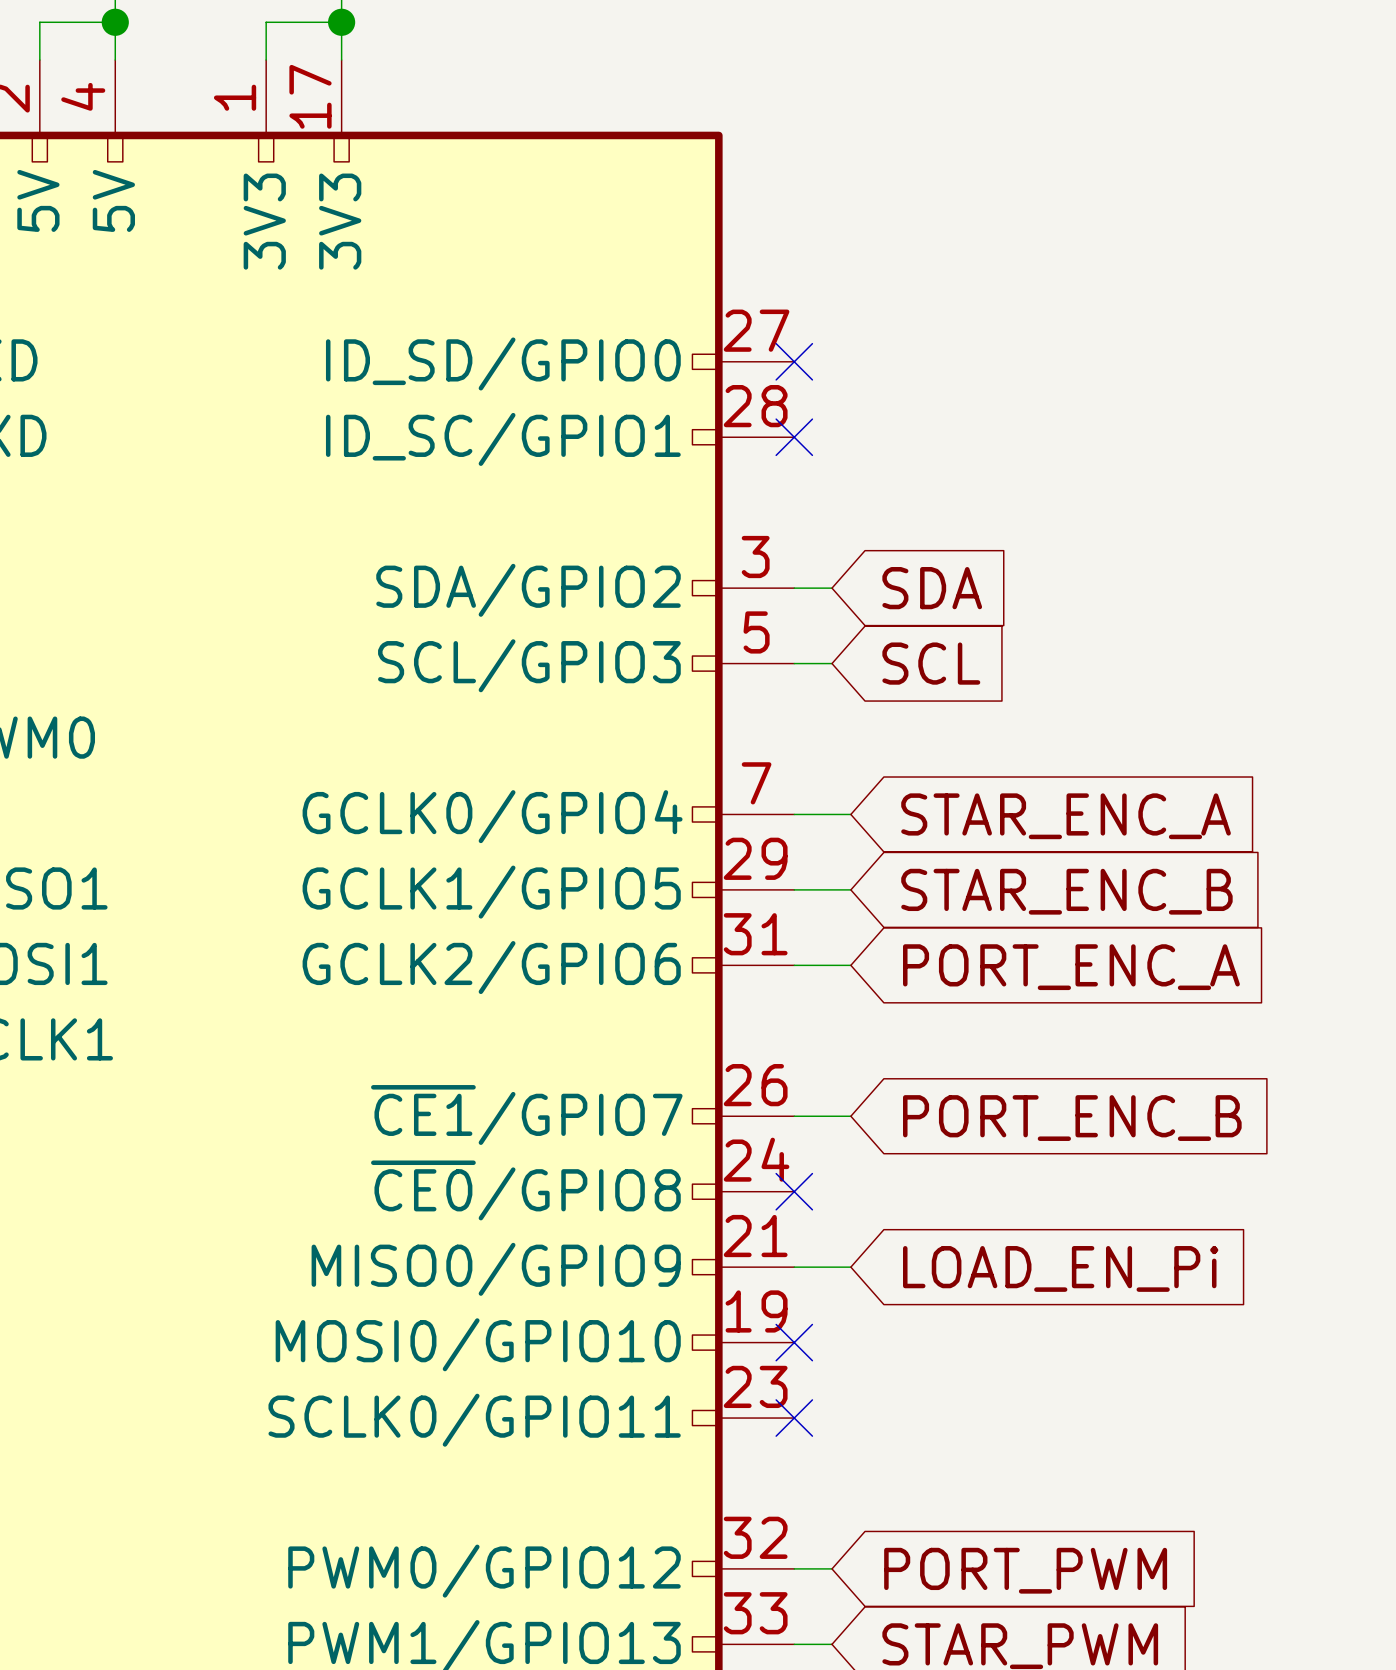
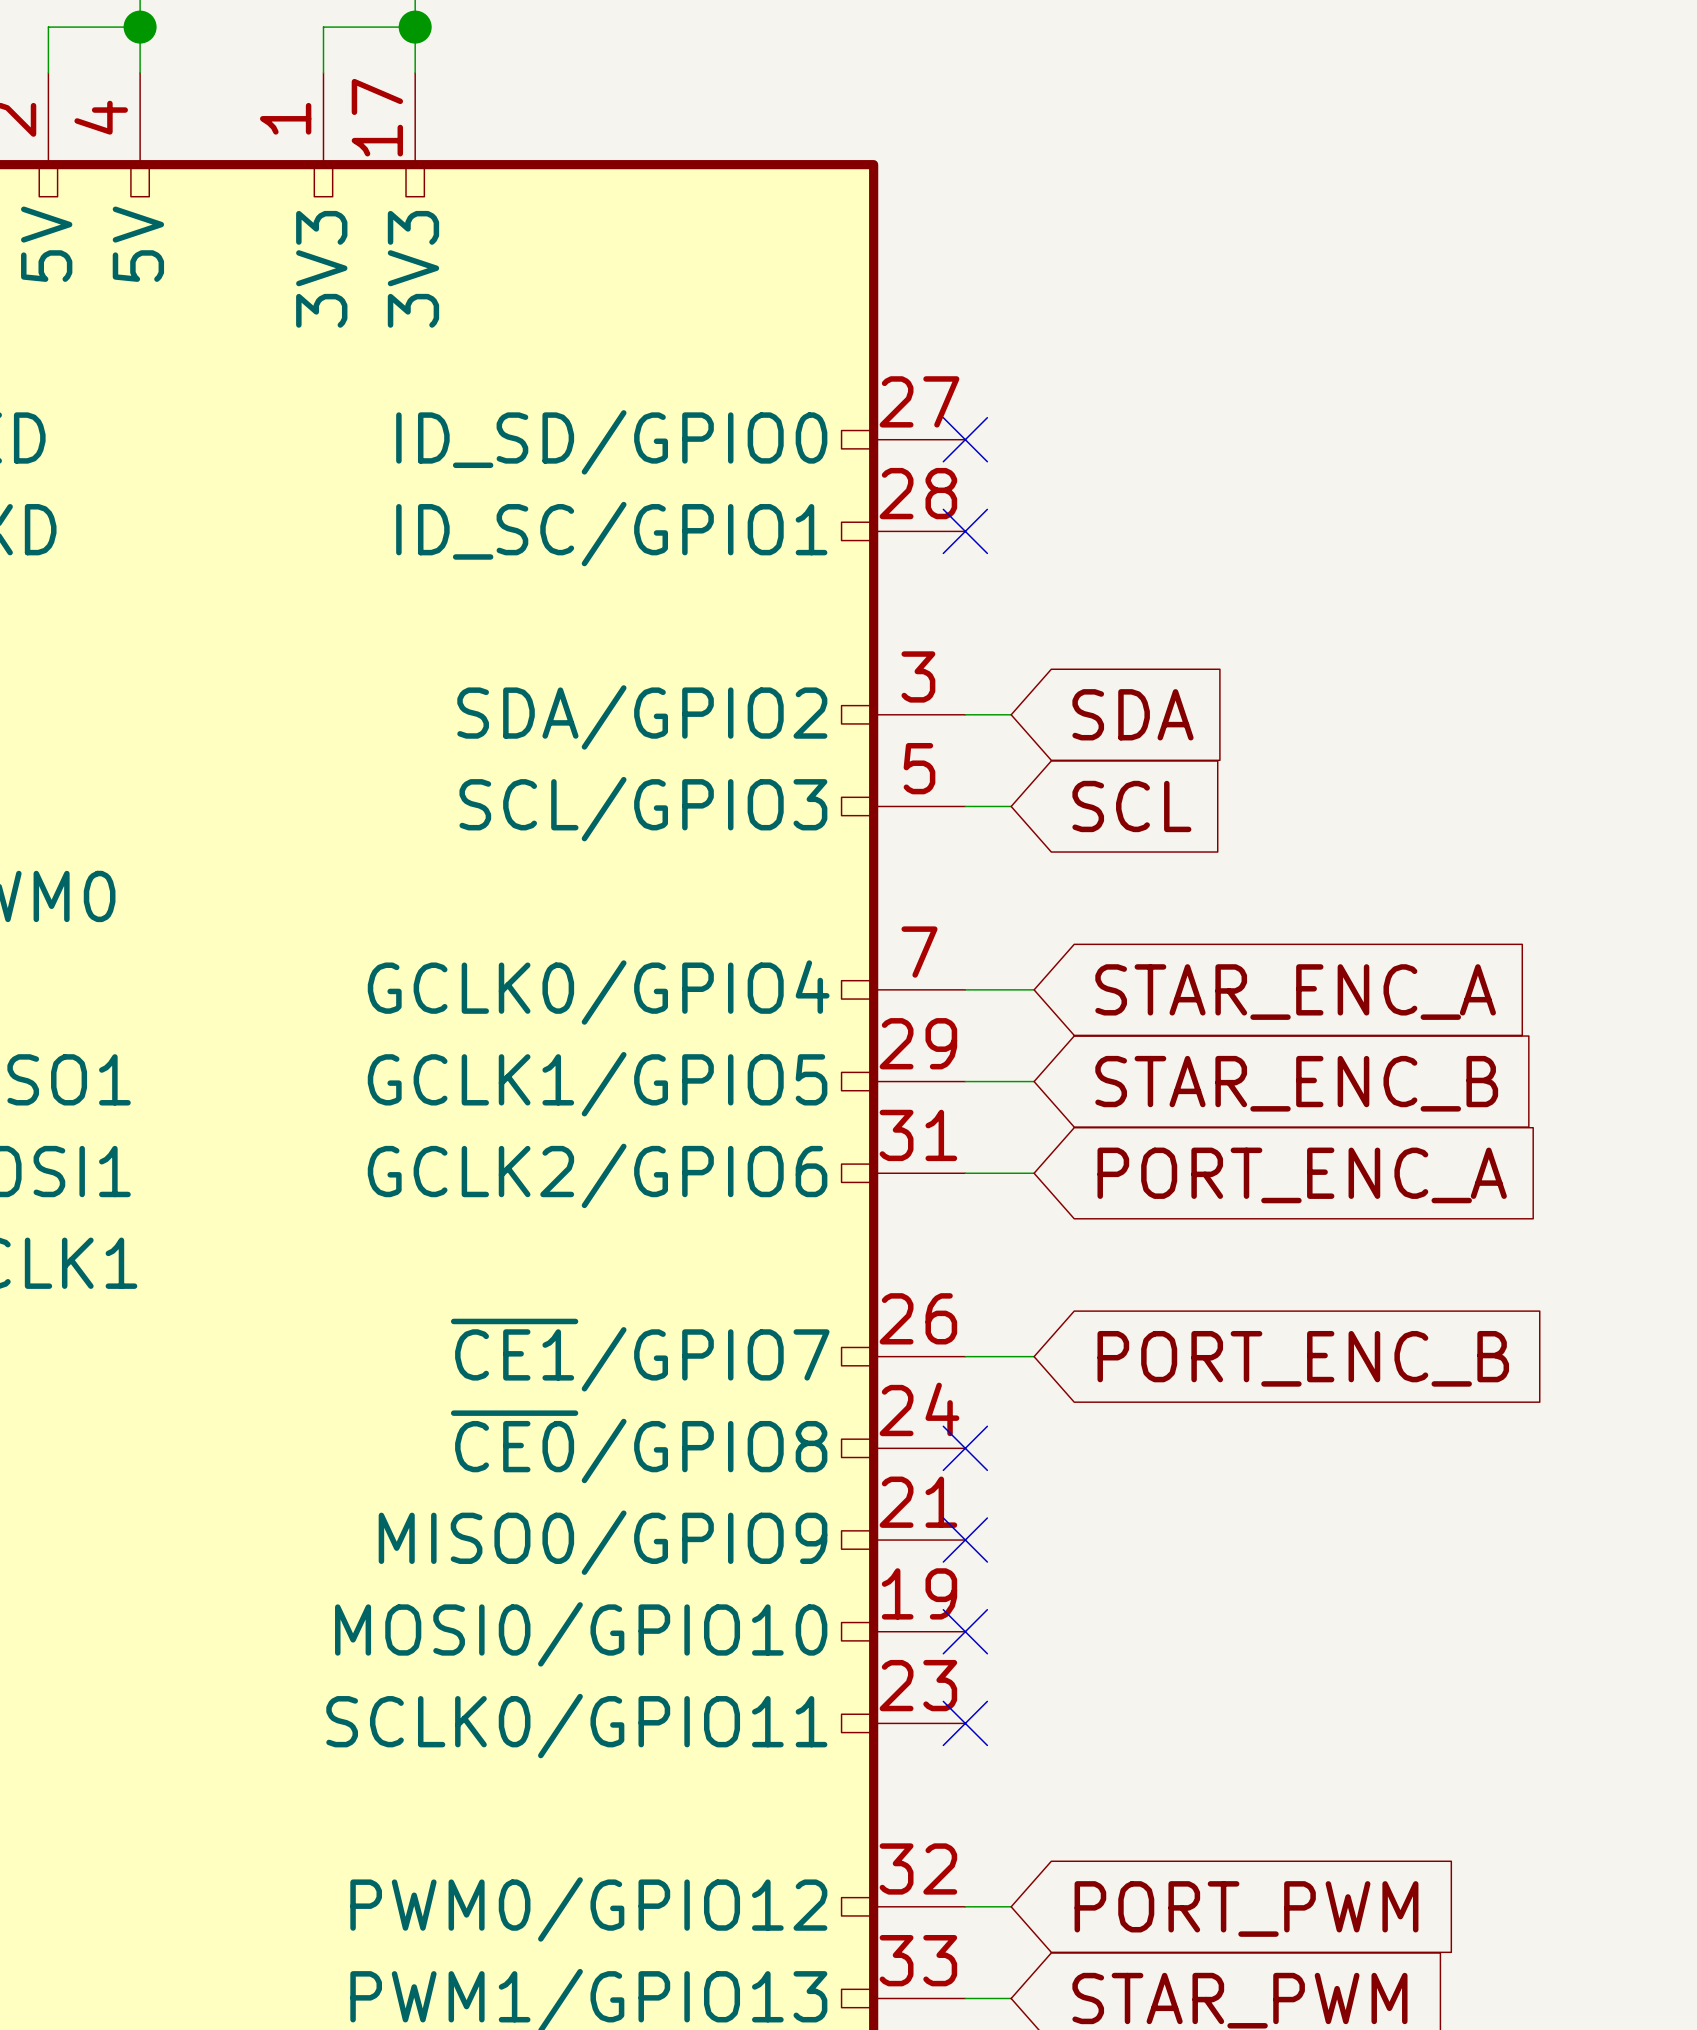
wire: (794, 1267) (850, 1267) -> none
no-connect mark: none -> (965, 1540)
global label: LOAD_EN_Pi (1060, 1268) -> none

